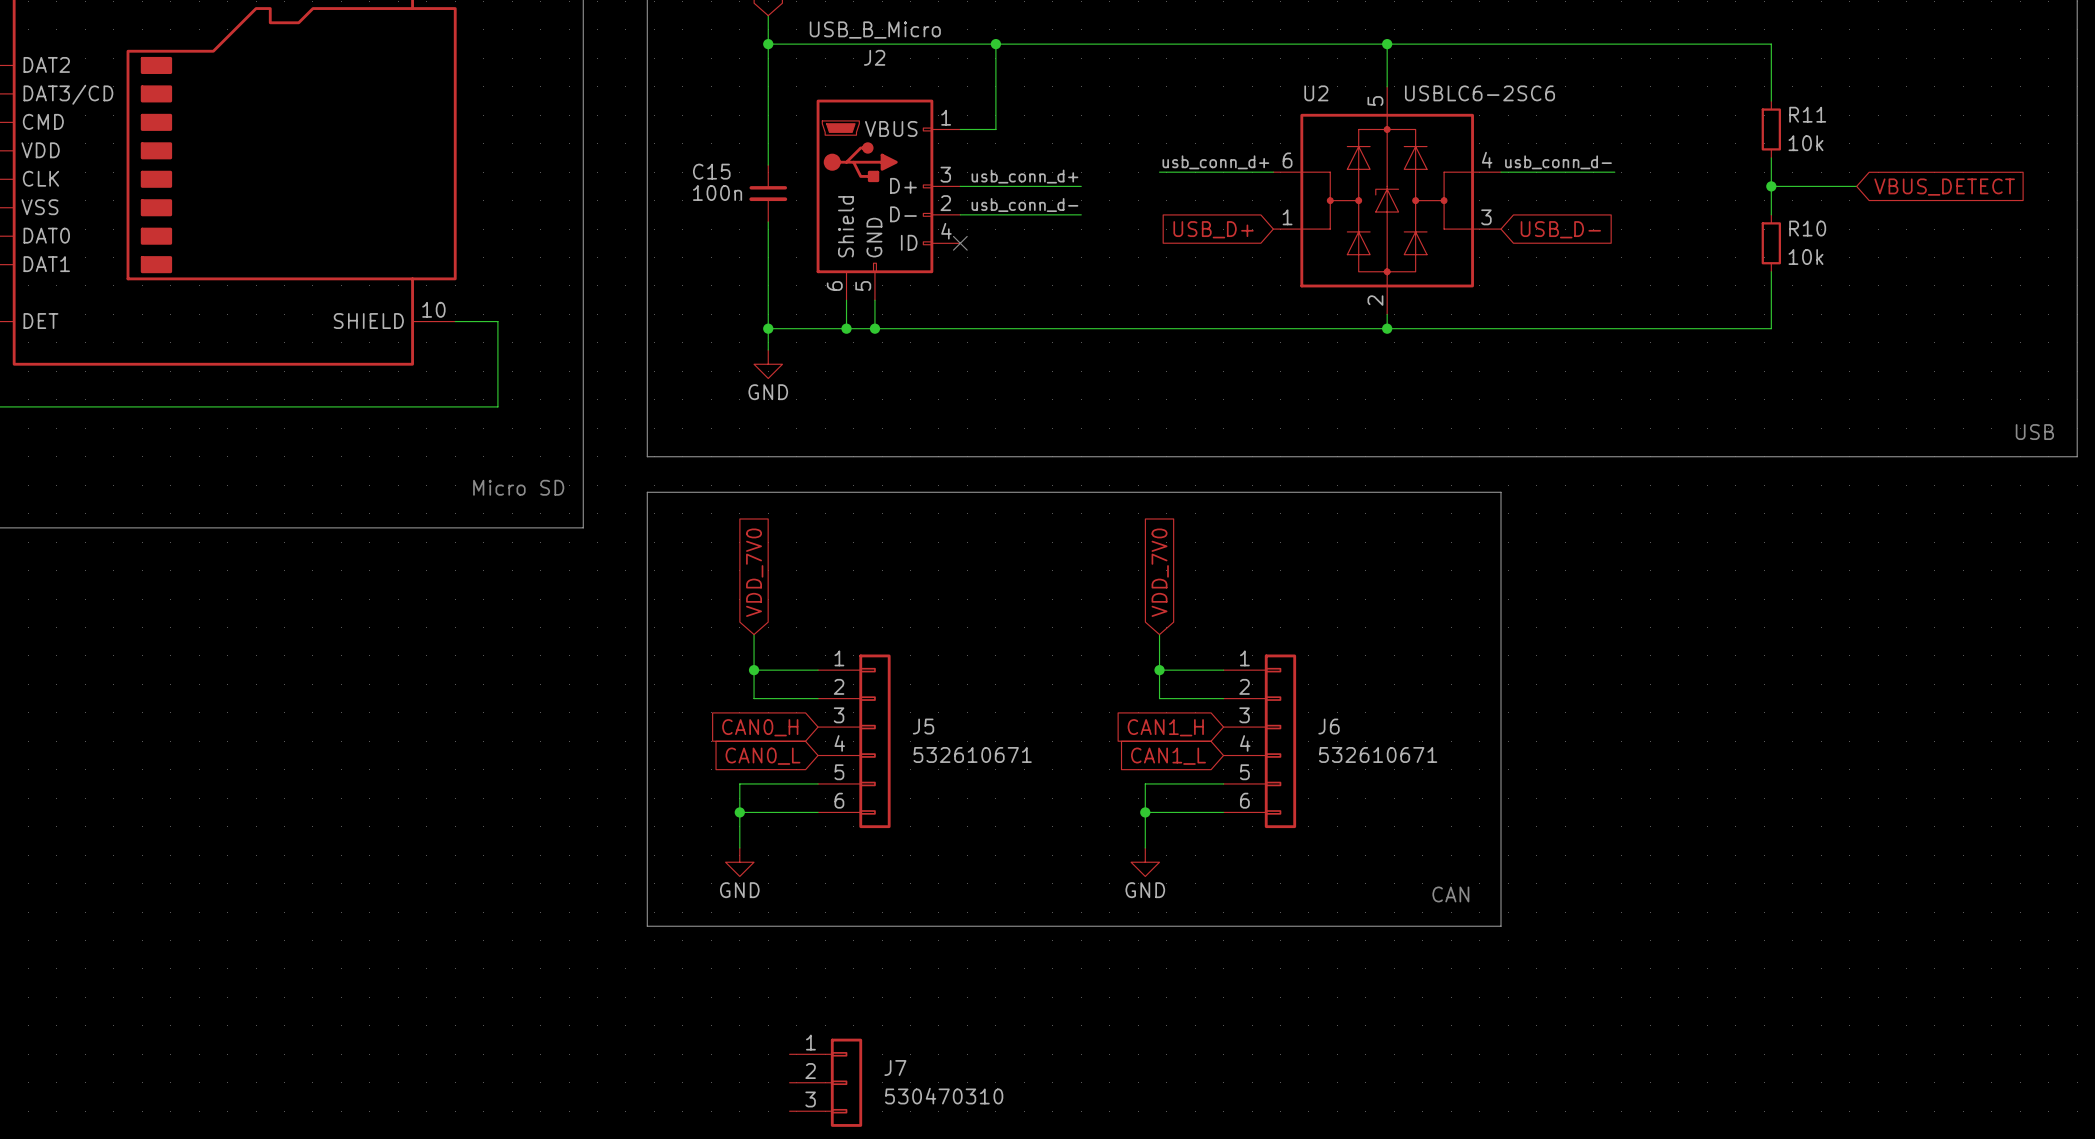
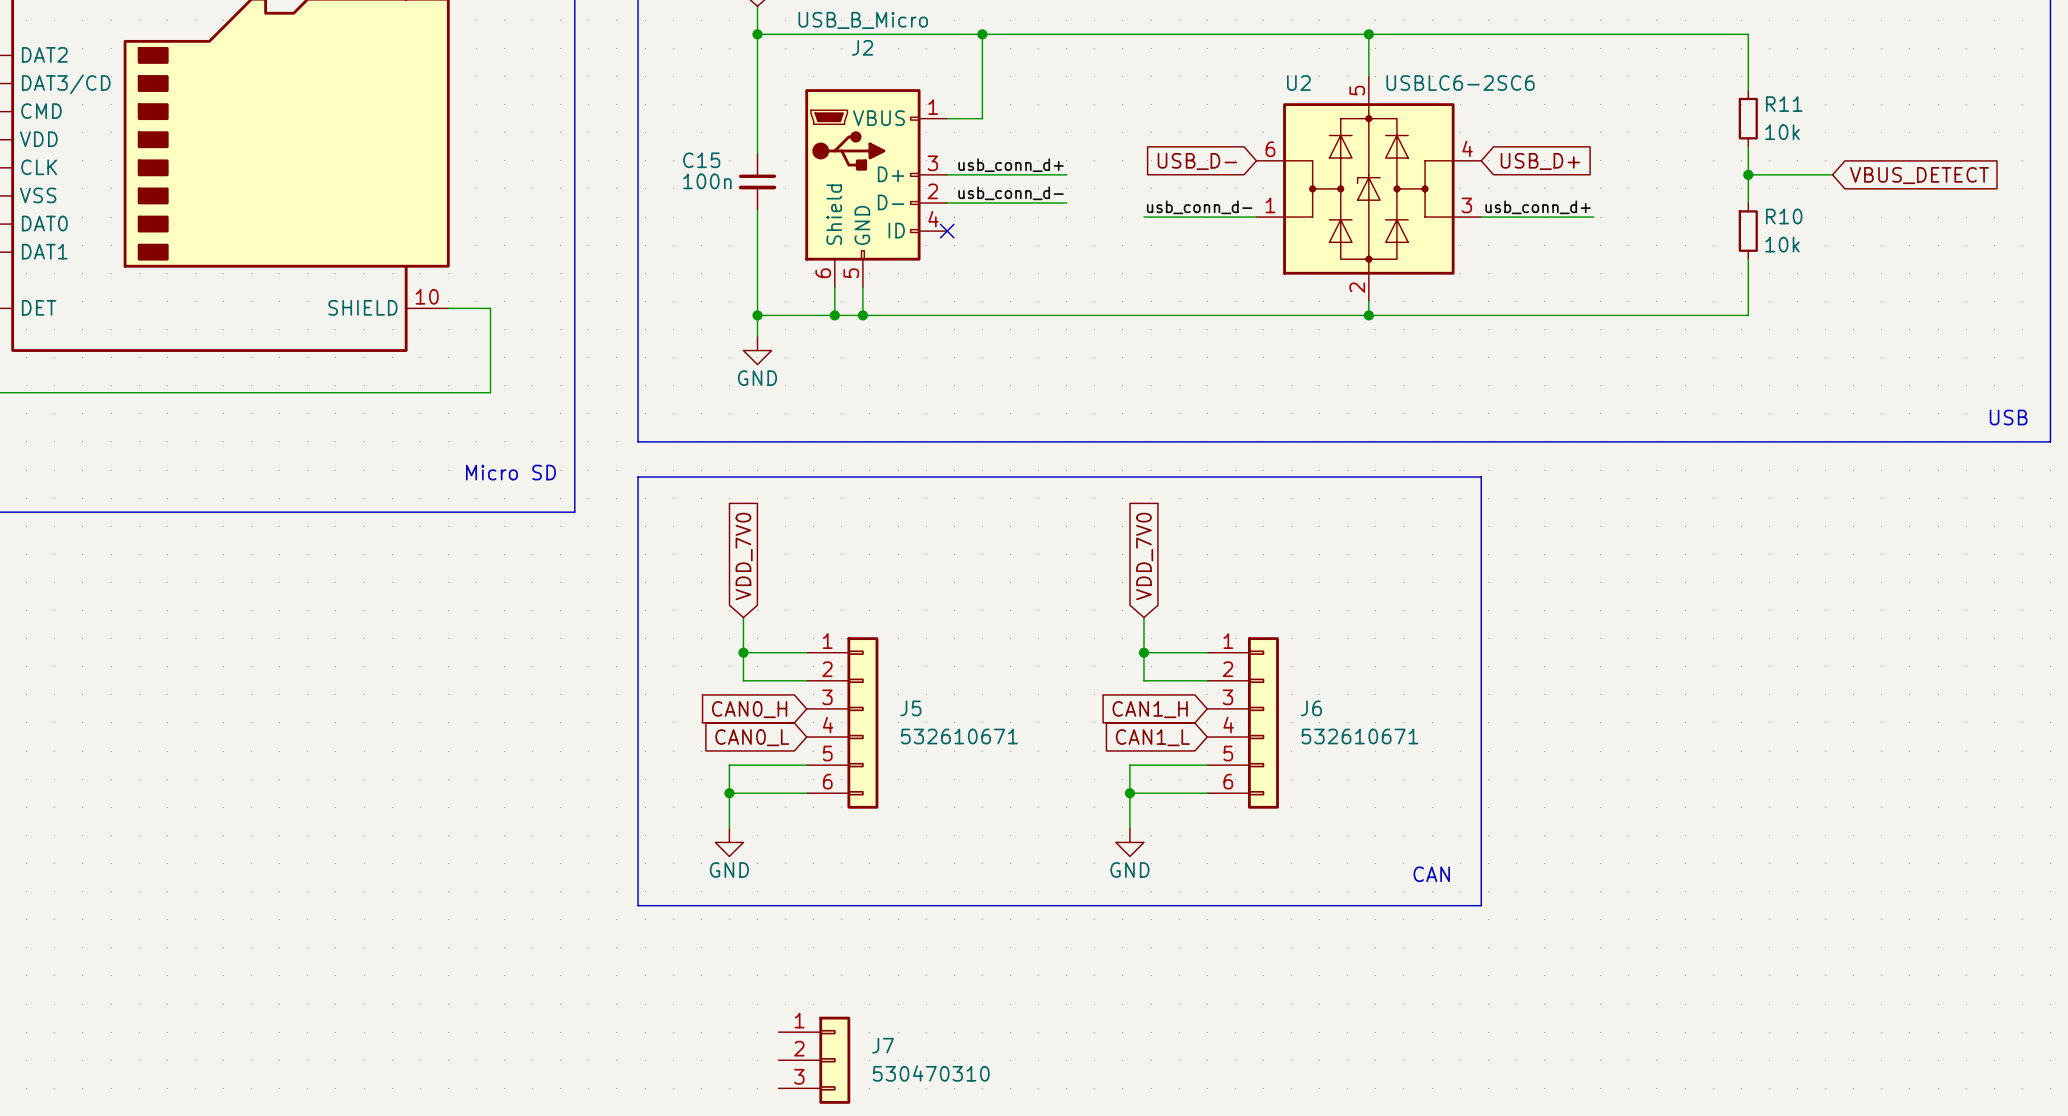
label: usb_conn_d+ (1215, 162) -> none
label: usb_conn_d- (1558, 162) -> none
wire: (1159, 172) (1273, 172) -> (1143, 217) (1256, 217)
wire: (1501, 172) (1614, 172) -> (1481, 217) (1593, 217)
label: none -> usb_conn_d- (1199, 207)
label: none -> usb_conn_d+ (1538, 207)
global label rotation: 0° (1213, 229) -> 180° (1540, 161)
global label position: USB_D+ (1213, 229) -> USB_D+ (1540, 161)
global label rotation: 0° (1560, 229) -> 180° (1197, 161)
global label position: USB_D- (1560, 229) -> USB_D- (1197, 161)

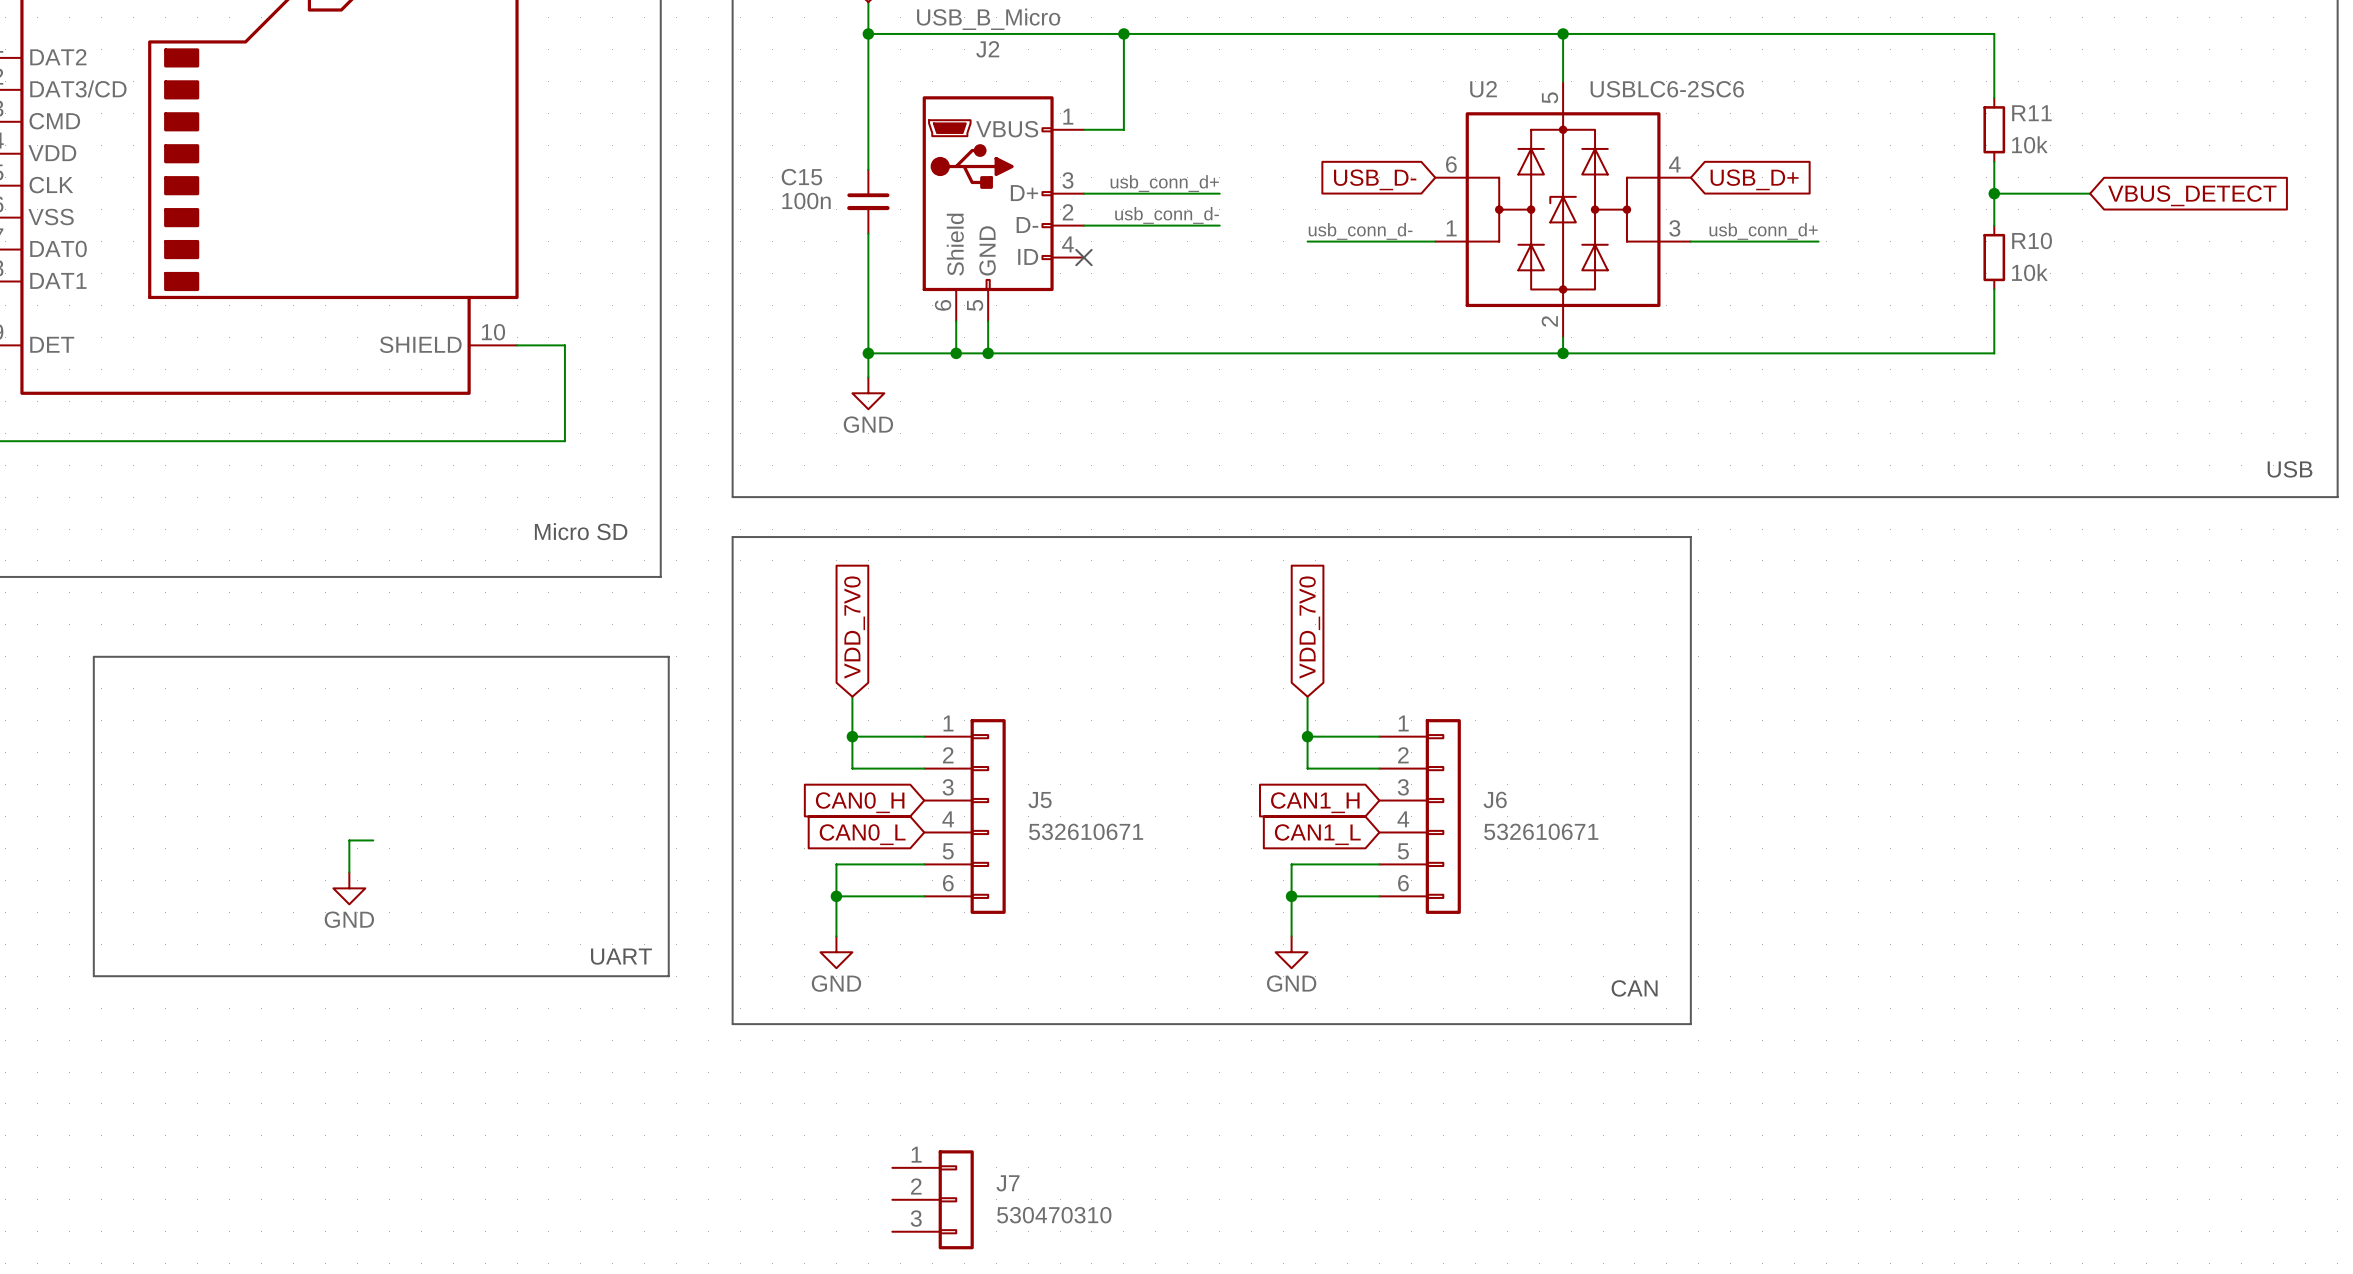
line: none -> (93, 656) (668, 656) (668, 976) (93, 976) (93, 656)
wire: none -> (373, 840) (349, 840) (349, 872)
power symbol: none -> GND (349, 888)
text: none -> UART (621, 956)

